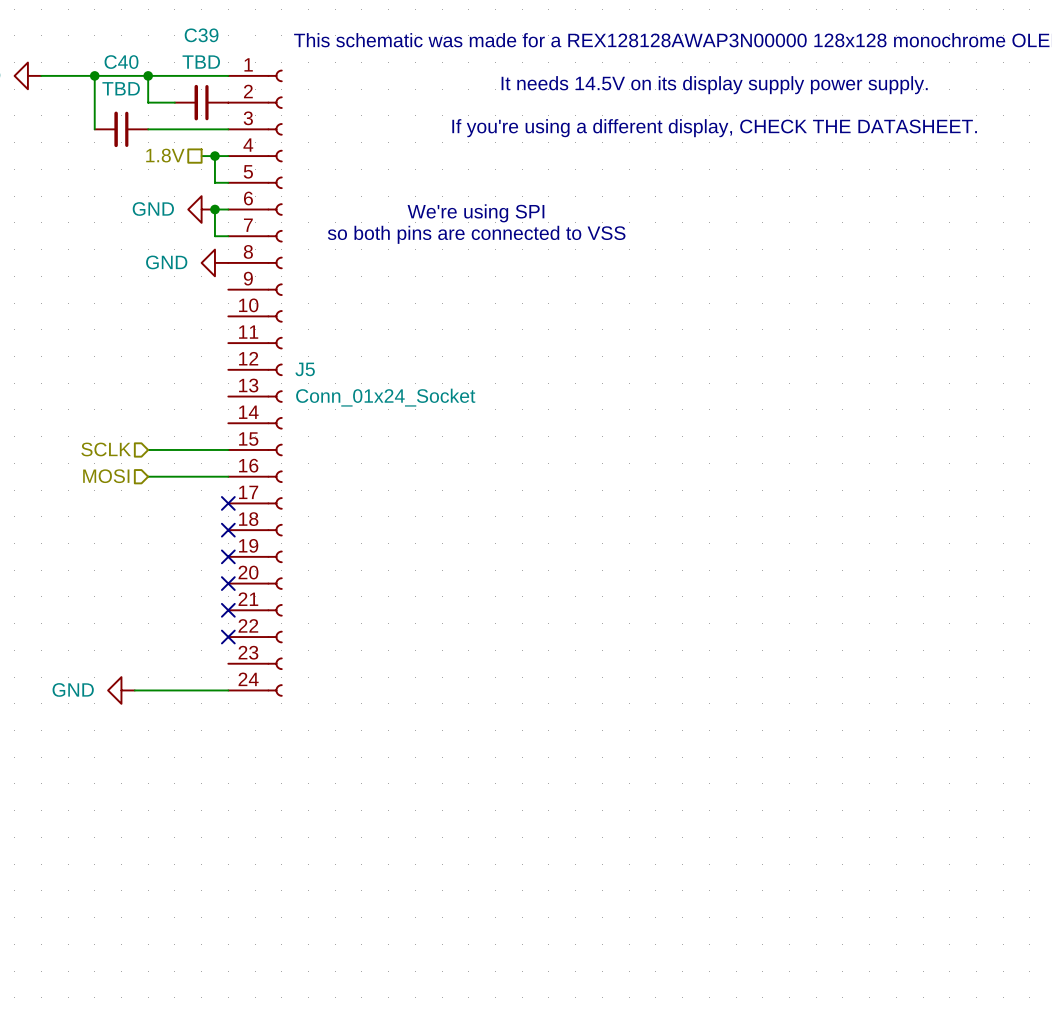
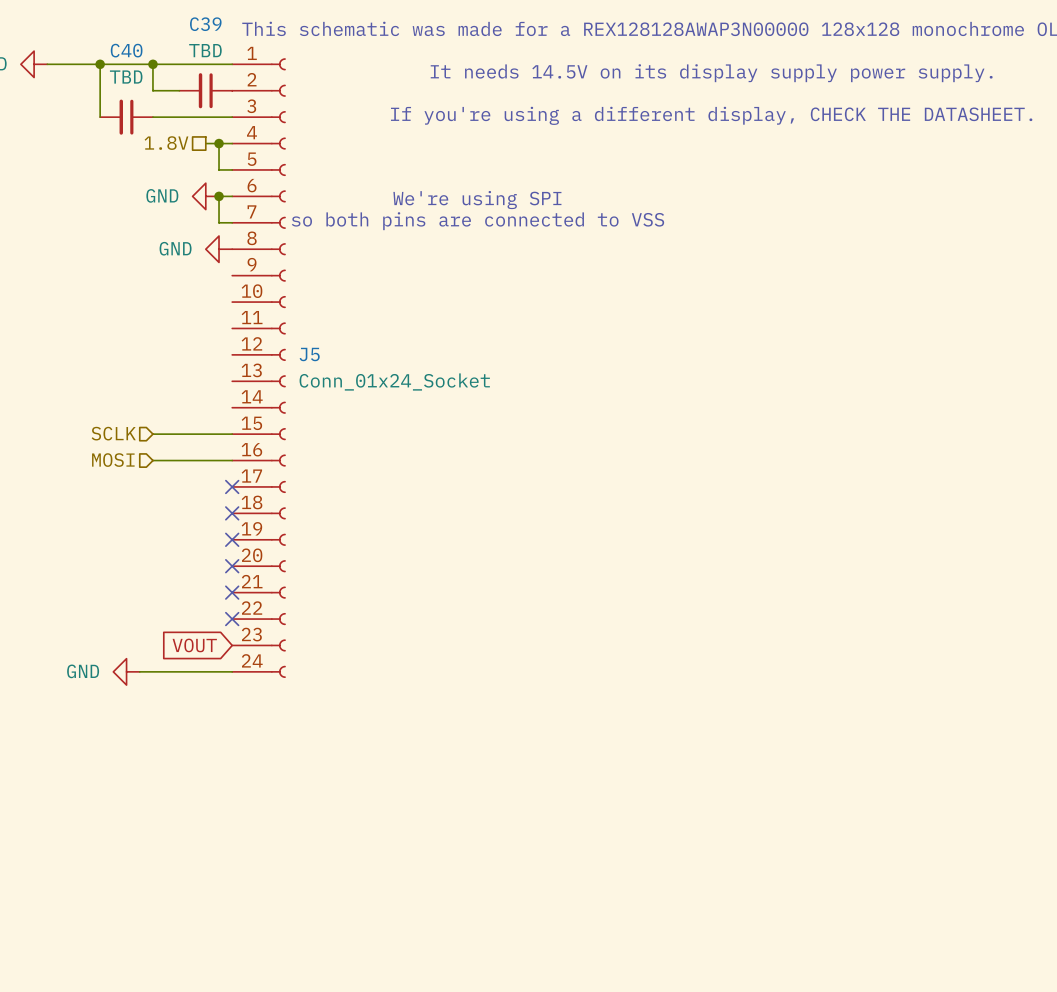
global label: none -> VOUT (194, 645)

